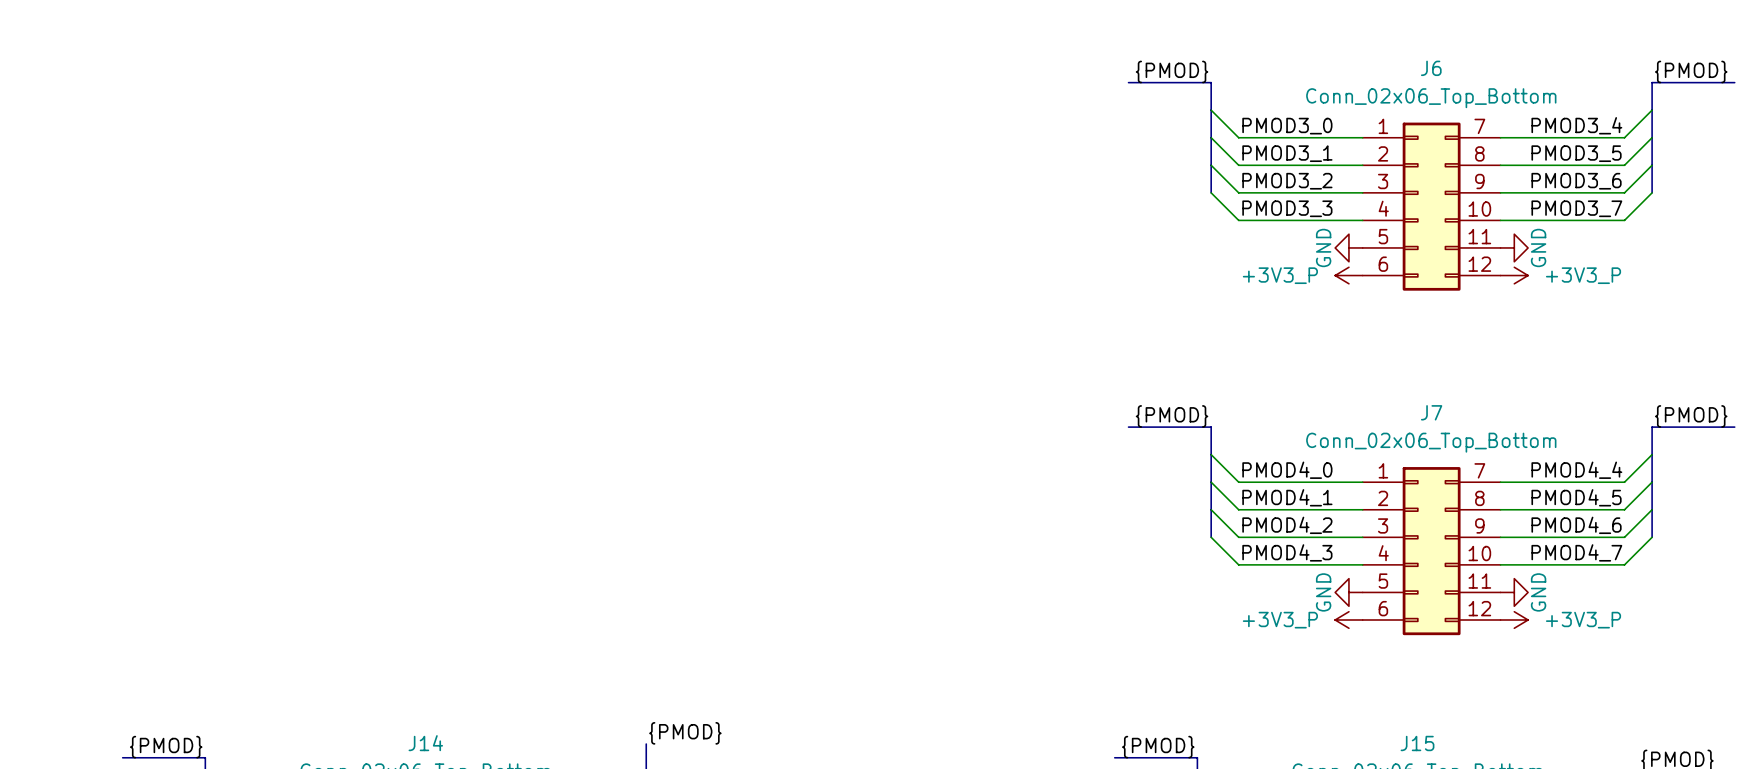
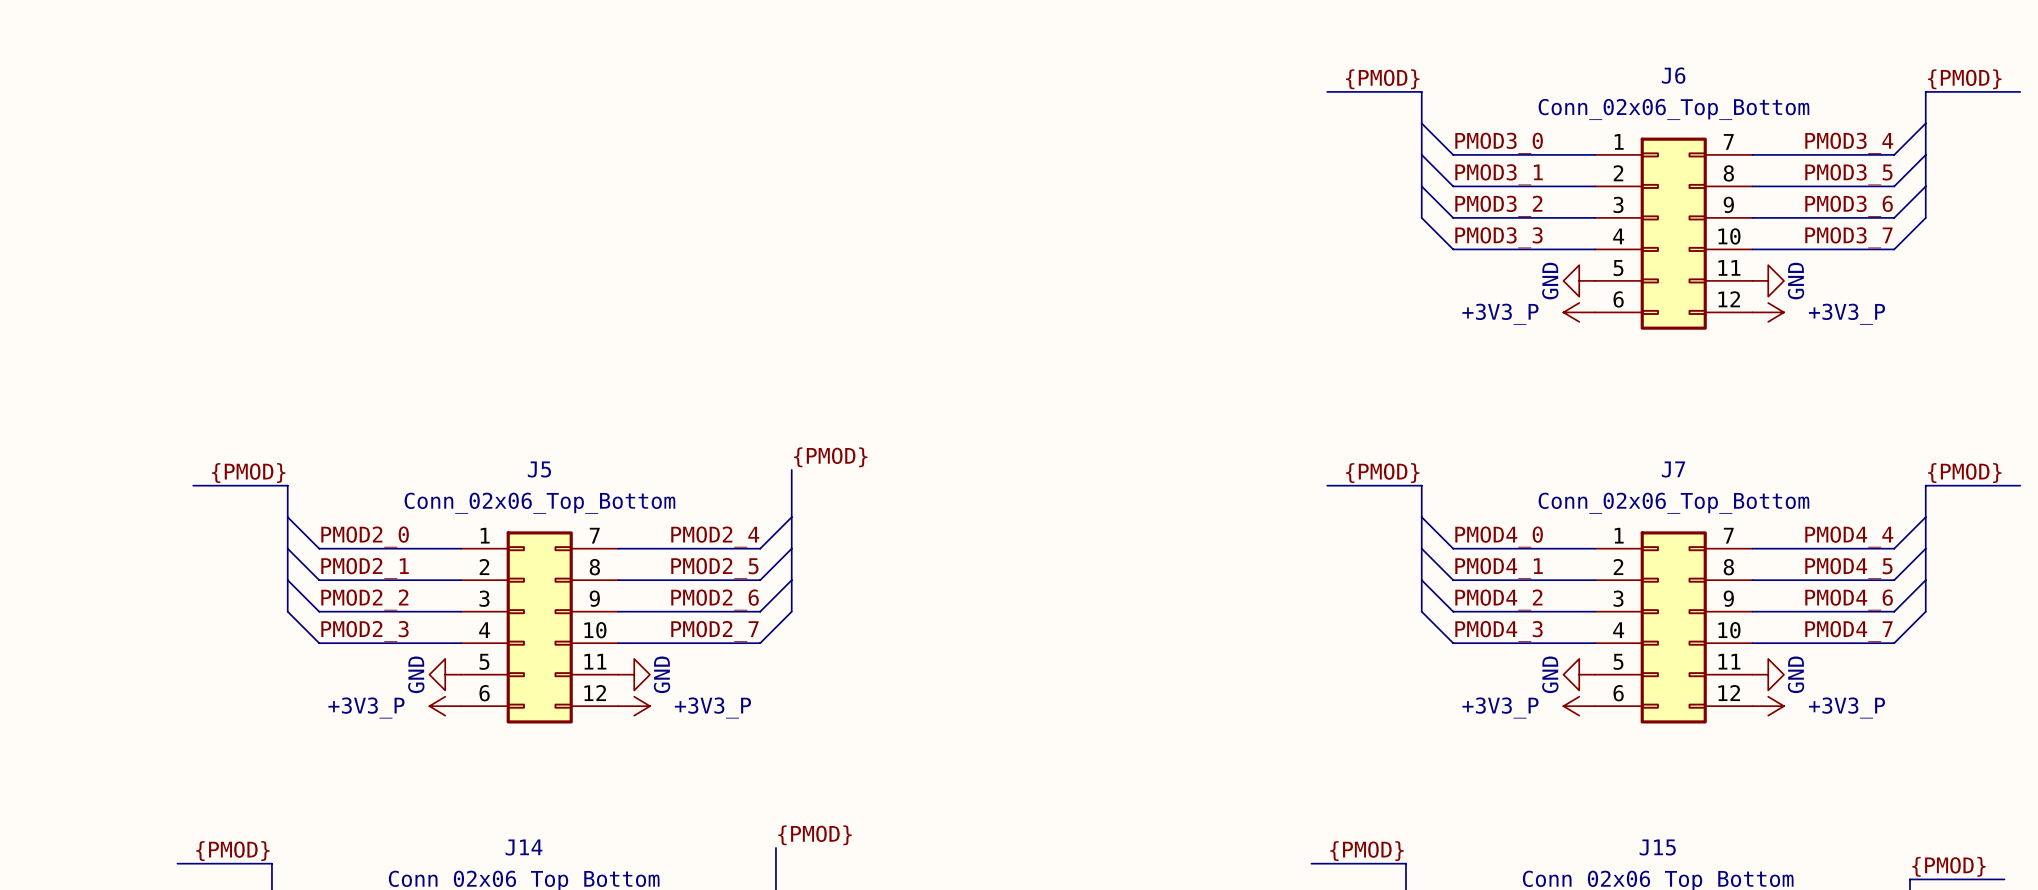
label: none -> {PMOD} (830, 457)
bus: none -> (791, 469) (791, 611)
label: none -> {PMOD} (248, 473)
bus: none -> (193, 485) (287, 485) (287, 611)
wire: none -> (287, 517) (319, 548) (460, 548)
wire: none -> (791, 517) (760, 548) (618, 548)
label: none -> PMOD2_0 (365, 537)
label: none -> PMOD2_4 (715, 537)
wire: none -> (287, 548) (319, 580) (460, 580)
wire: none -> (791, 548) (760, 580) (618, 580)
label: none -> PMOD2_1 (365, 568)
label: none -> PMOD2_5 (714, 568)
wire: none -> (287, 580) (319, 611) (460, 611)
wire: none -> (791, 580) (760, 611) (618, 611)
label: none -> PMOD2_2 (364, 600)
label: none -> PMOD2_6 (715, 600)
wire: none -> (287, 611) (319, 643) (460, 643)
wire: none -> (791, 611) (760, 643) (618, 643)
J5: none -> Conn_02x06_Top_Bottom (539, 627)
label: none -> PMOD2_3 (364, 631)
label: none -> PMOD2_7 (714, 631)
power symbol: none -> GND (445, 674)
power symbol: none -> GND (634, 674)
power symbol: none -> +3V3_P (445, 706)
power symbol: none -> +3V3_P (634, 706)

